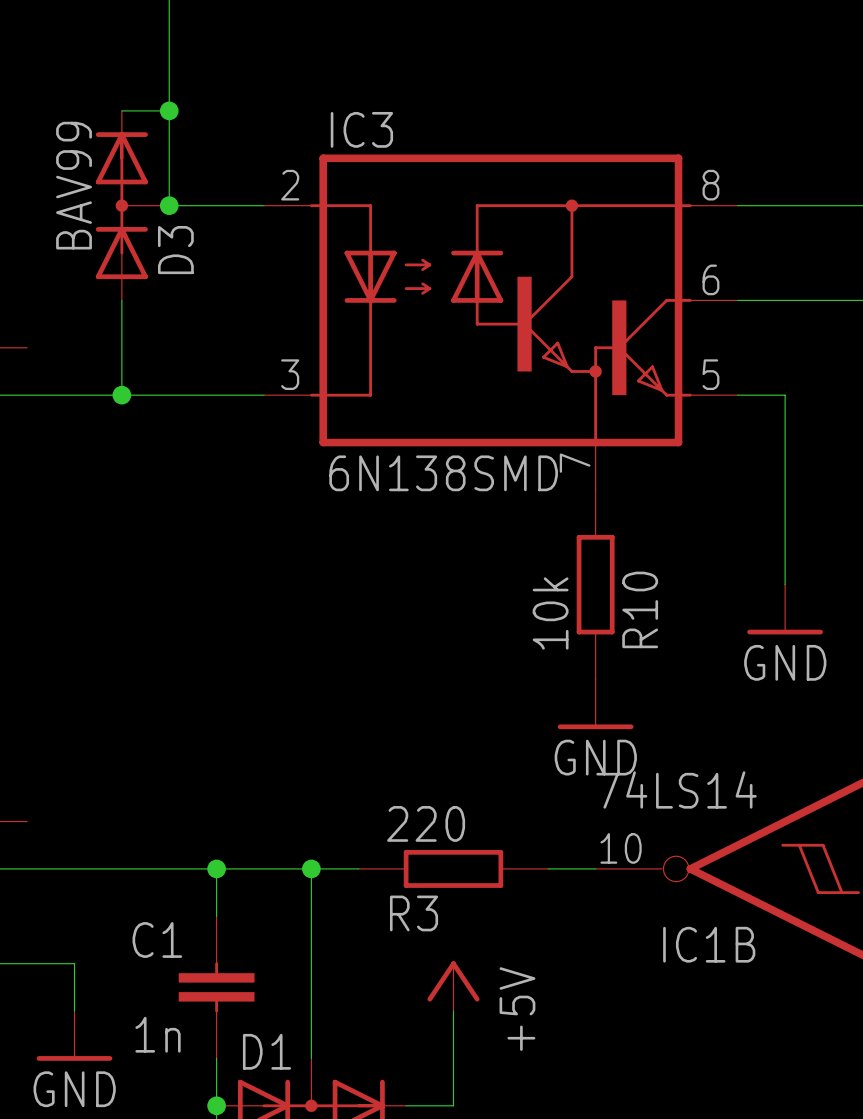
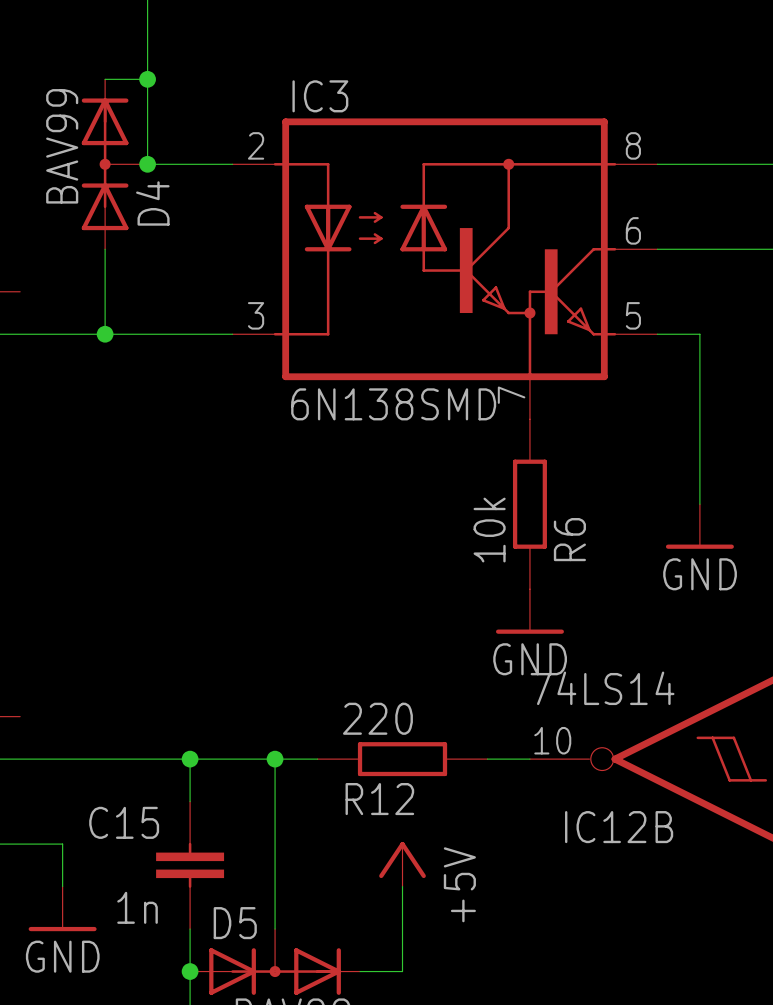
D3 name: D3 (175, 250) -> D4 (152, 203)
R10 name: R10 (640, 609) -> R6 (569, 539)
R3 name: R3 (414, 913) -> R12 (379, 799)
C1 name: C1 (157, 939) -> C15 (124, 822)
IC1B name: IC1B (709, 944) -> IC12B (619, 827)
D1 name: D1 (266, 1051) -> D5 (235, 923)

